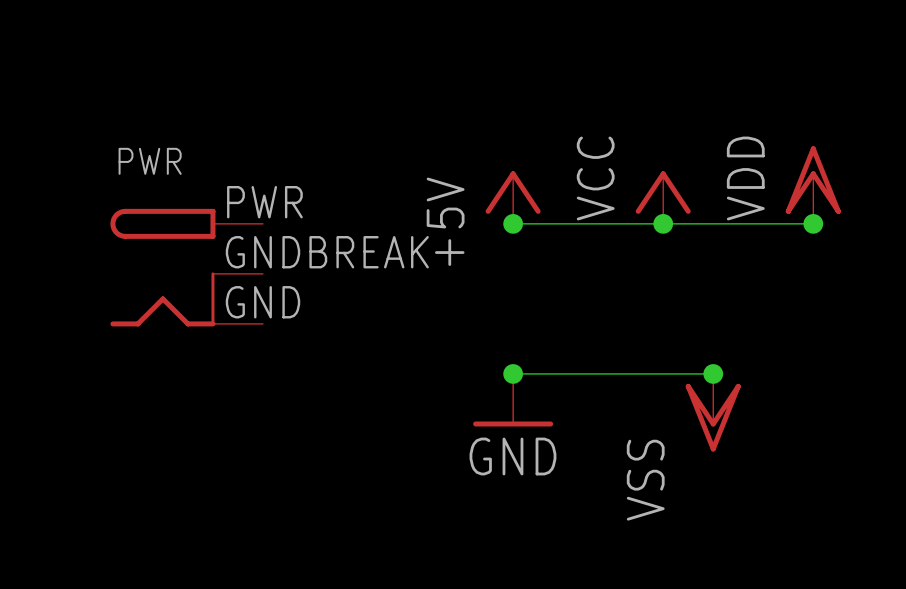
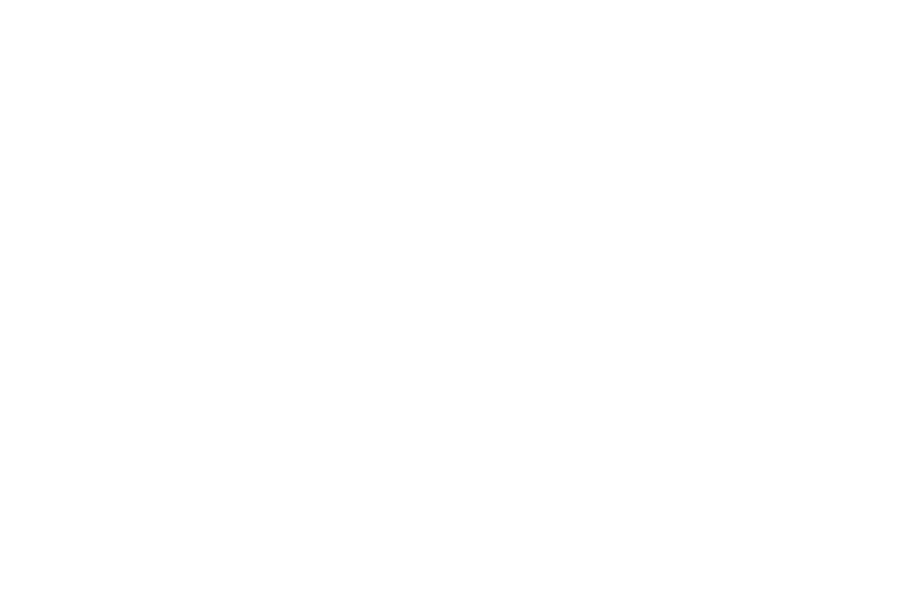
power symbol: VDD (813, 185) -> none
power symbol: +5V (513, 197) -> none
power symbol: VCC (663, 197) -> none
wire: (513, 223) (813, 223) -> none
junction: (513, 223) -> none
junction: (663, 223) -> none
junction: (813, 223) -> none
PWR: (186, 267) -> none
wire: (513, 373) (713, 373) -> none
junction: (513, 373) -> none
junction: (713, 373) -> none
power symbol: GND (513, 400) -> none
power symbol: VSS (713, 412) -> none

